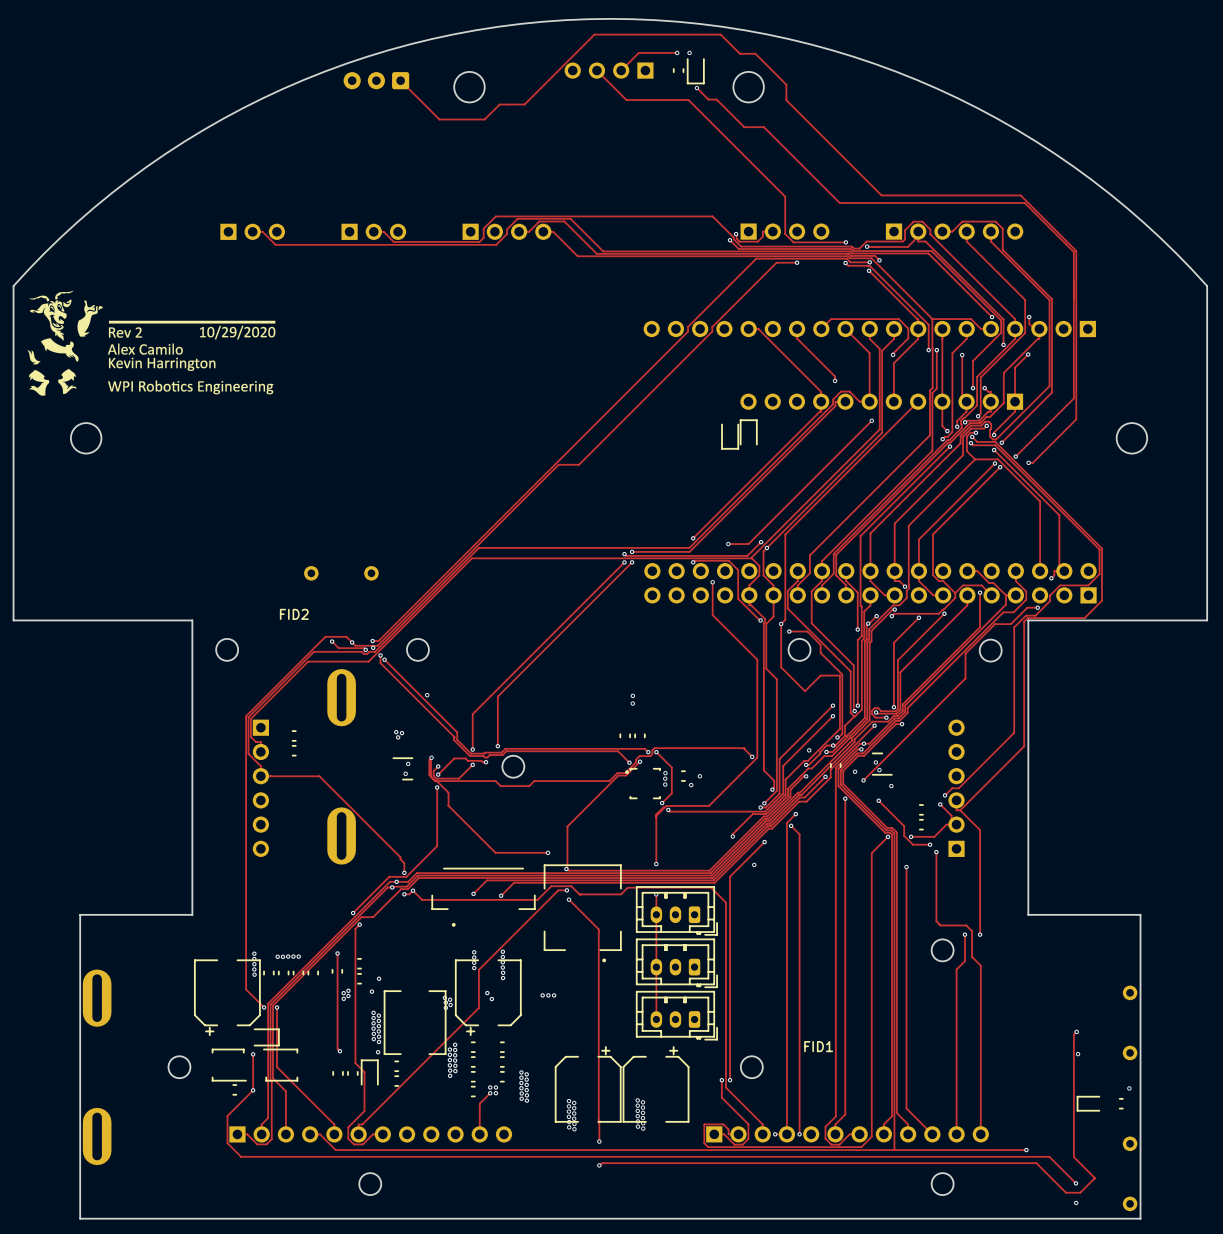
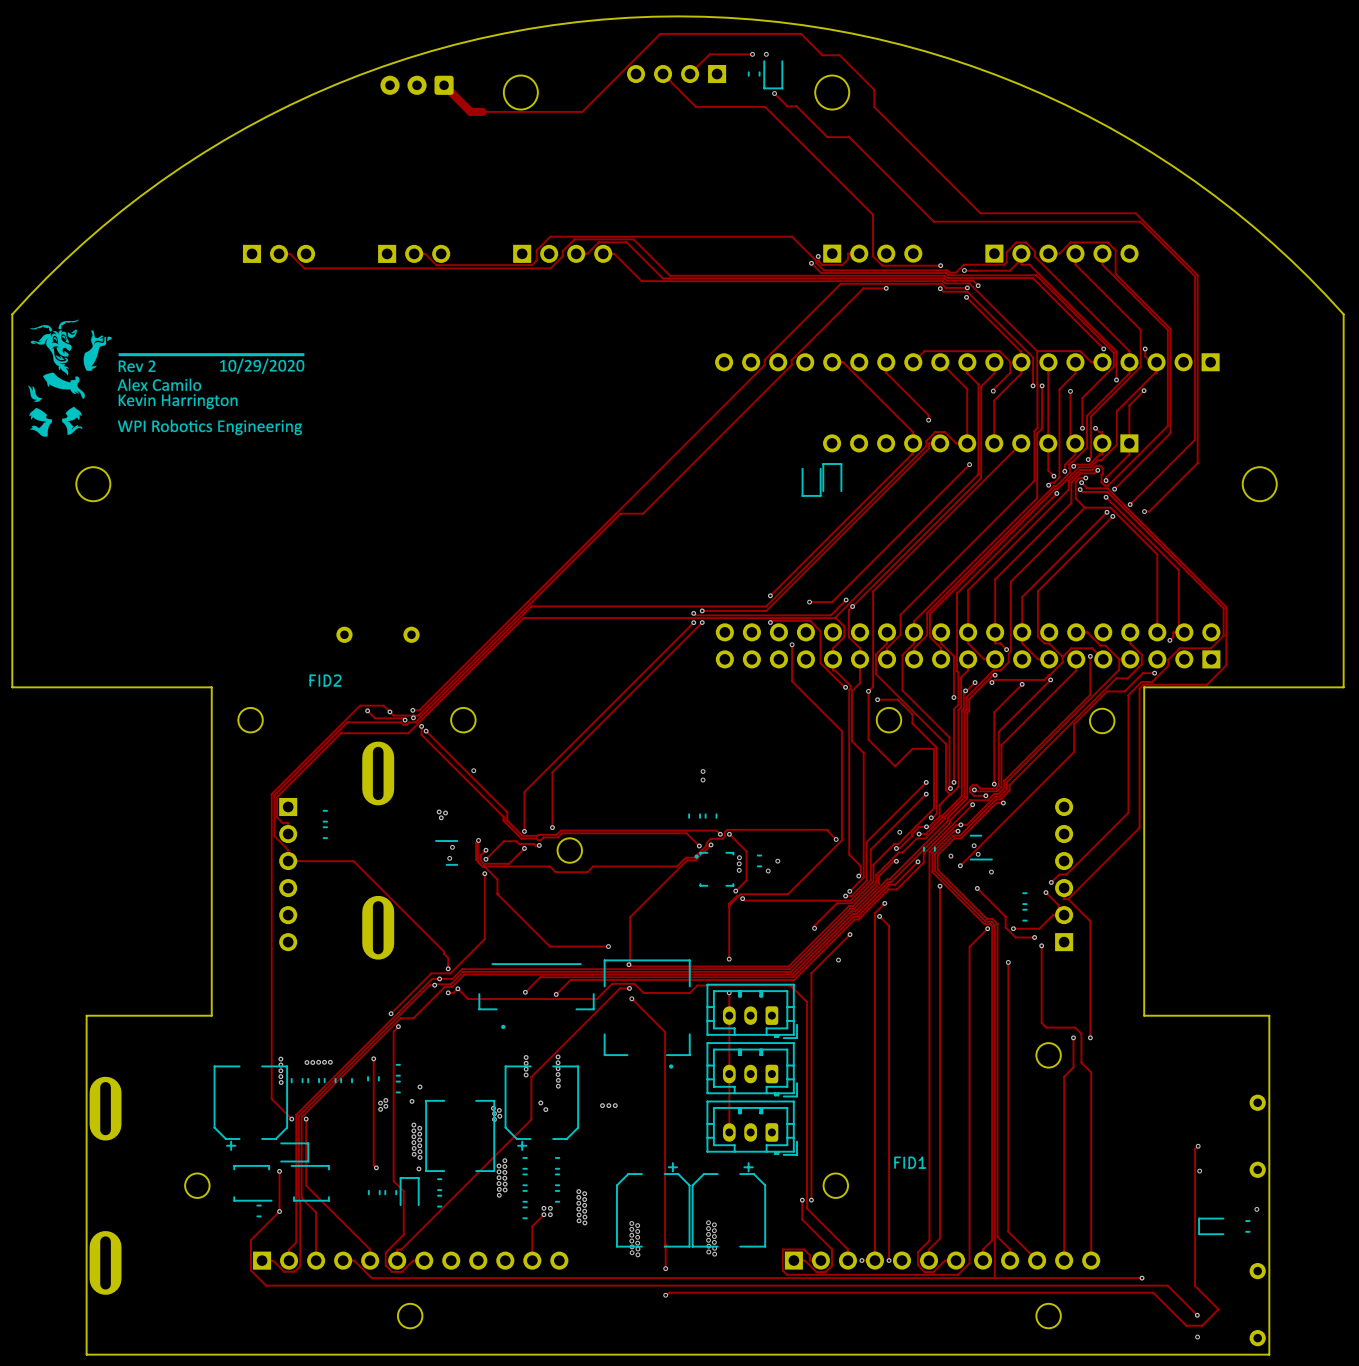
track width: thin (400, 80) (424, 104) -> thick (444, 85) (470, 111)
track: (424, 104) (439, 119) (484, 119) (499, 104) -> (470, 111) (554, 111)

